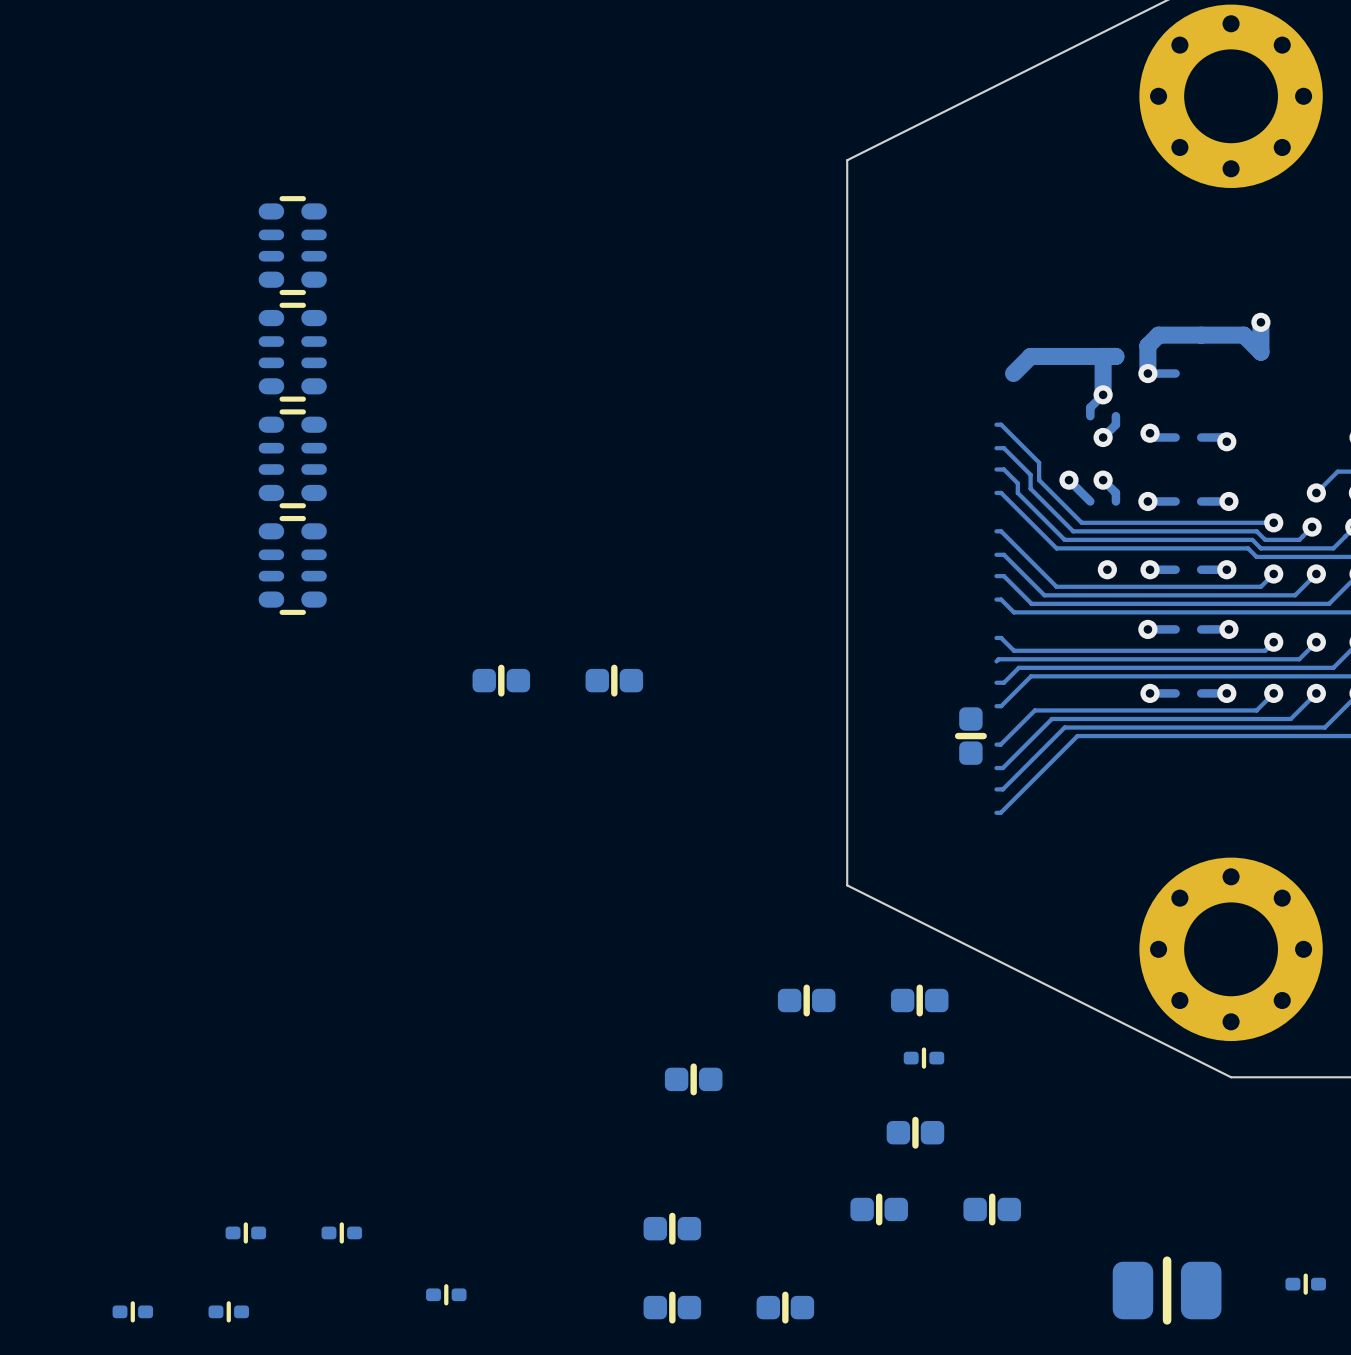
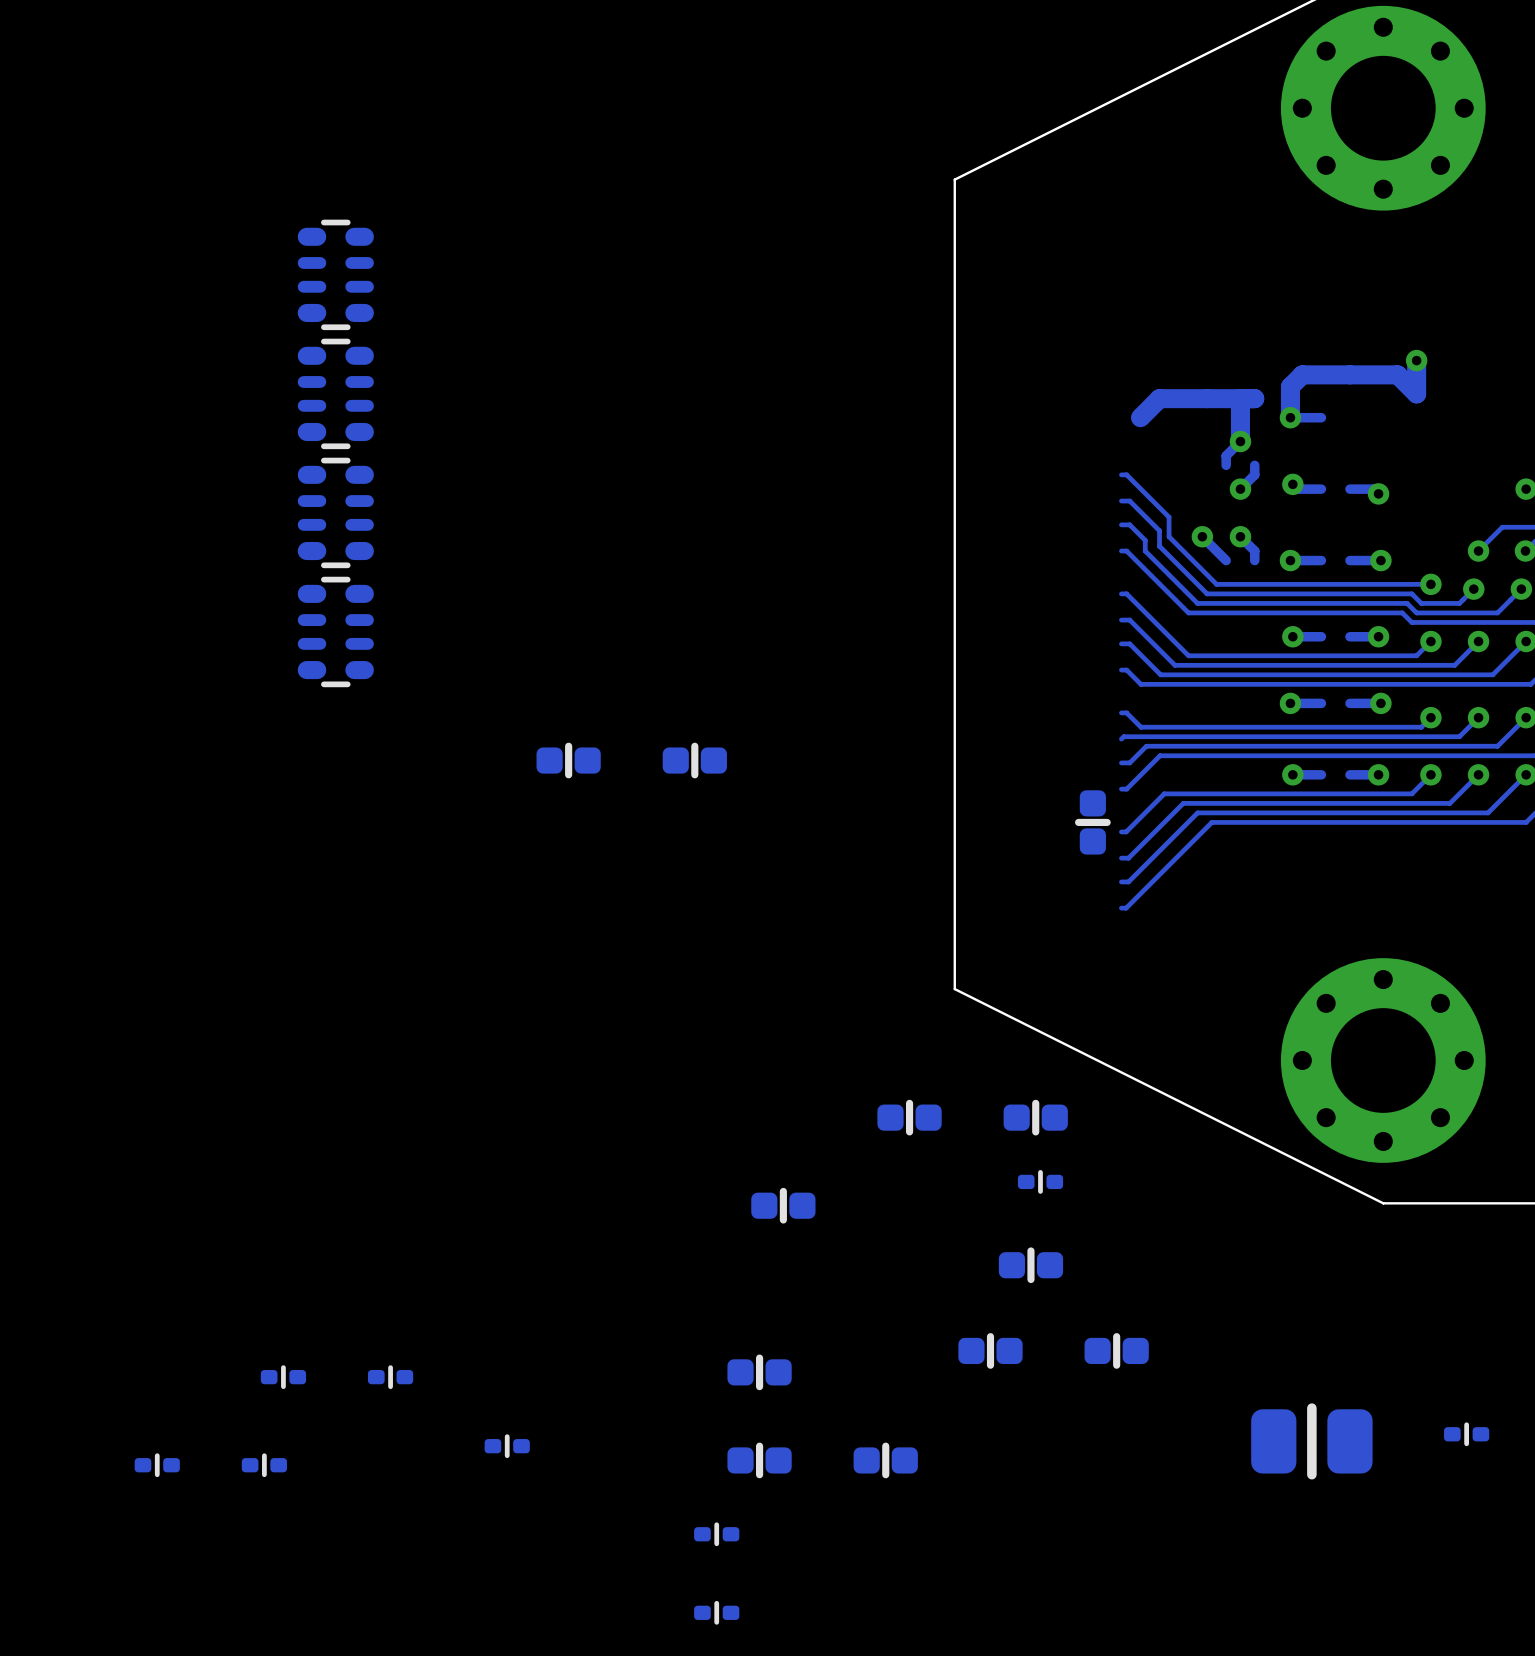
via: (1107, 569) -> none

